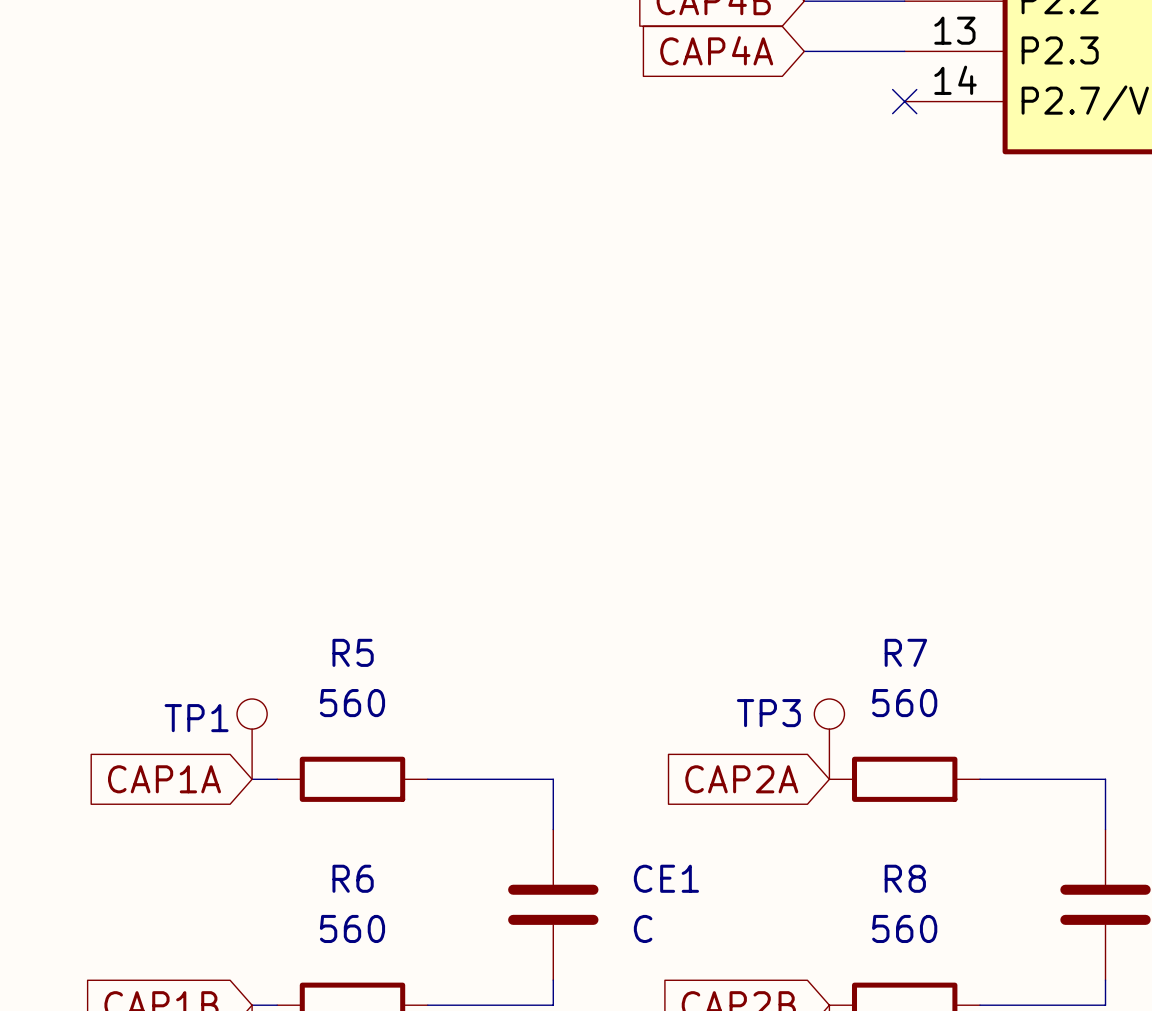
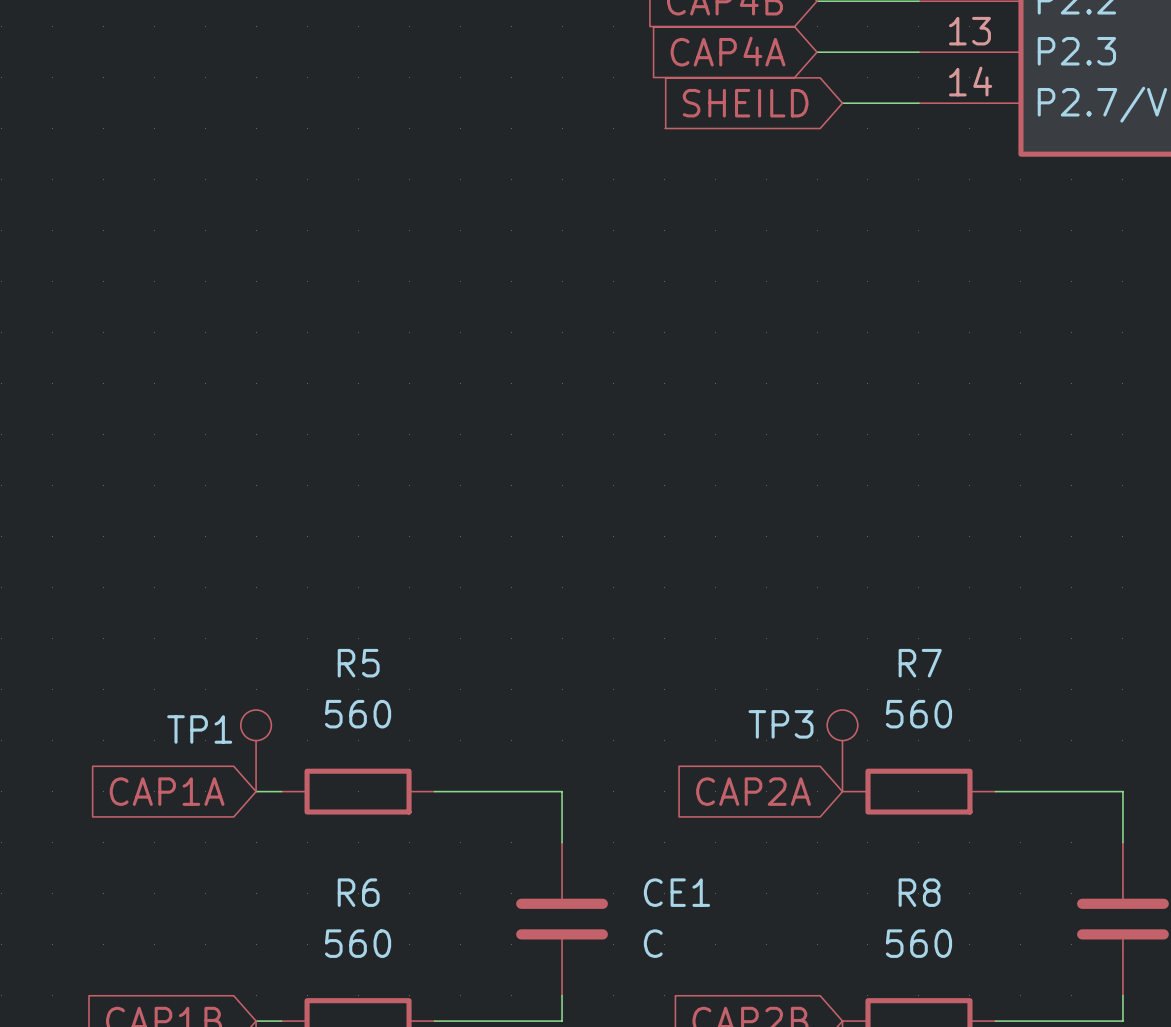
global label: none -> SHEILD (745, 103)
wire: none -> (842, 103) (918, 103)
no-connect mark: (904, 101) -> none

